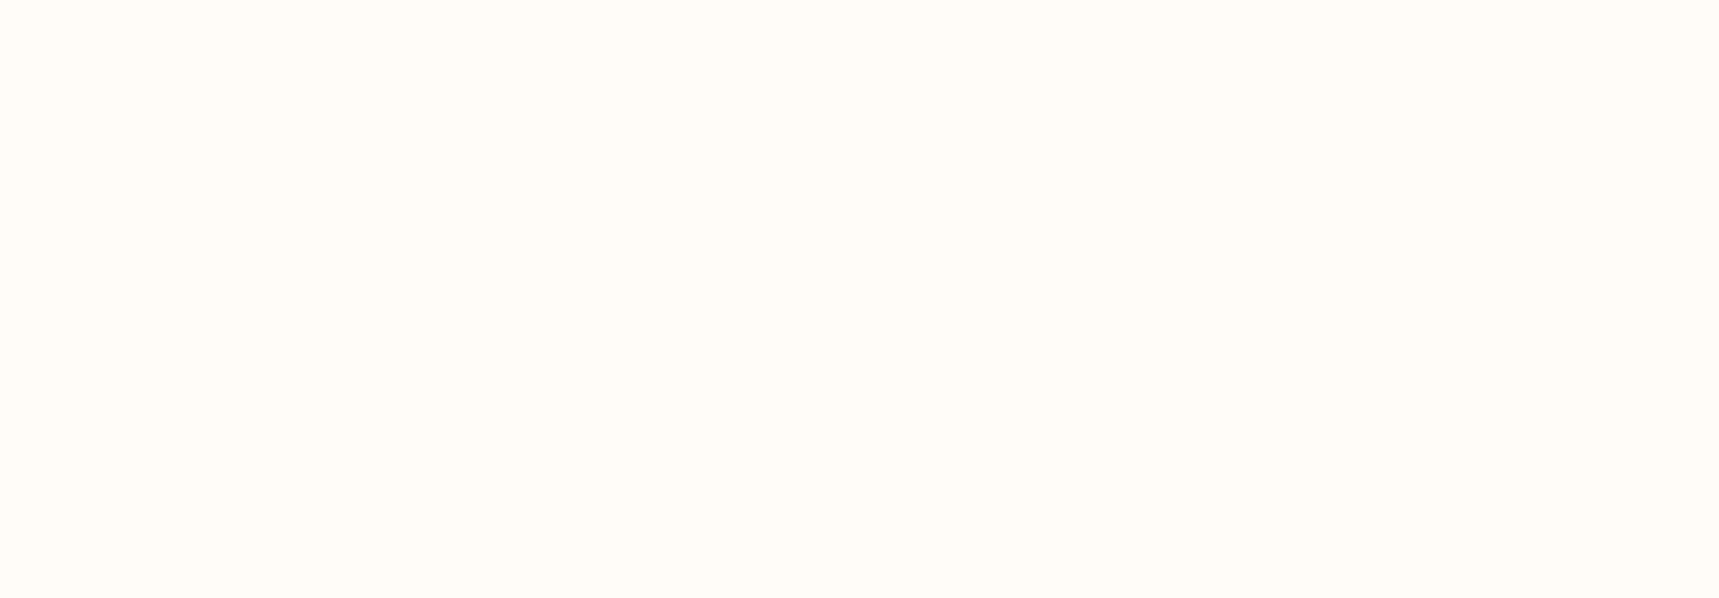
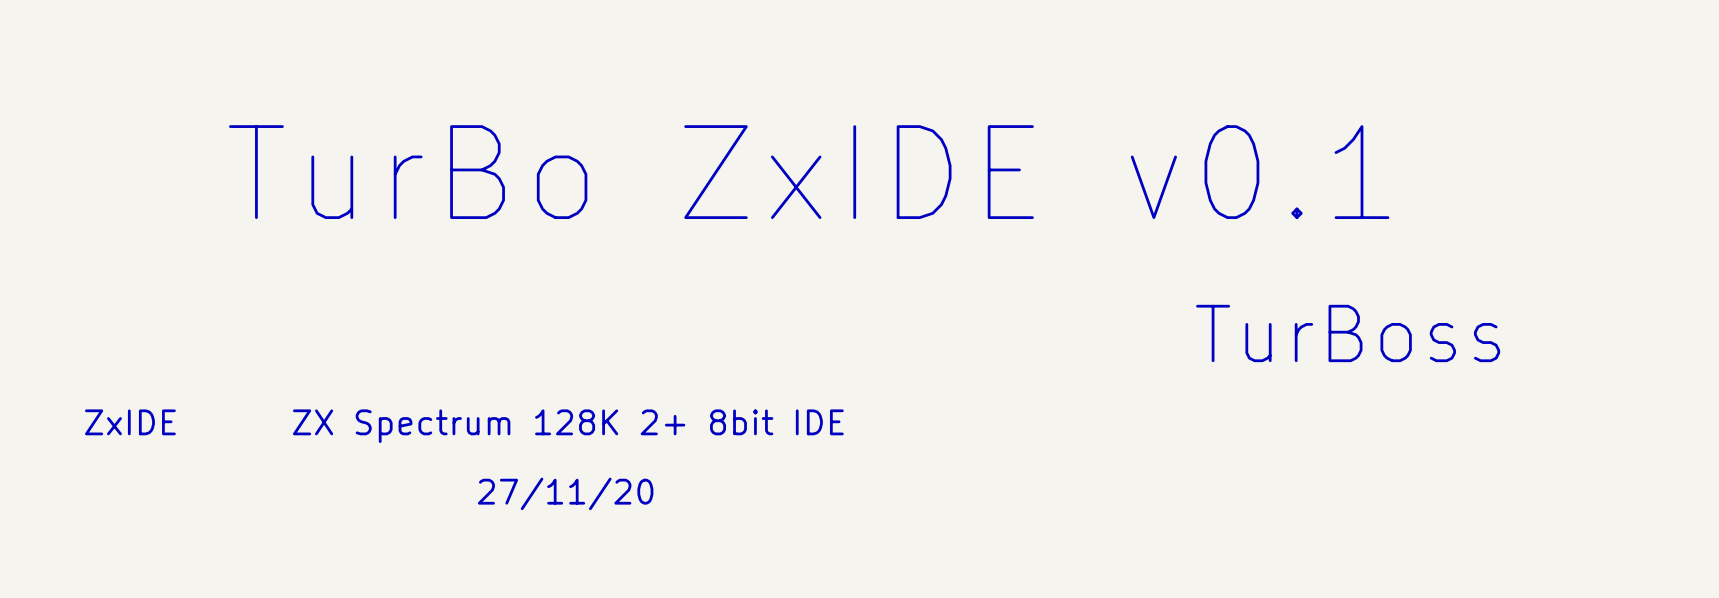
text: none -> TurBo ZxIDE v0.1 (809, 172)
text: none -> TurBoss (1348, 333)
text: none -> ZxIDE (130, 422)
text: none -> ZX Spectrum 128K 2+ 8bit IDE (568, 426)
text: none -> 27/11/20 (565, 493)

